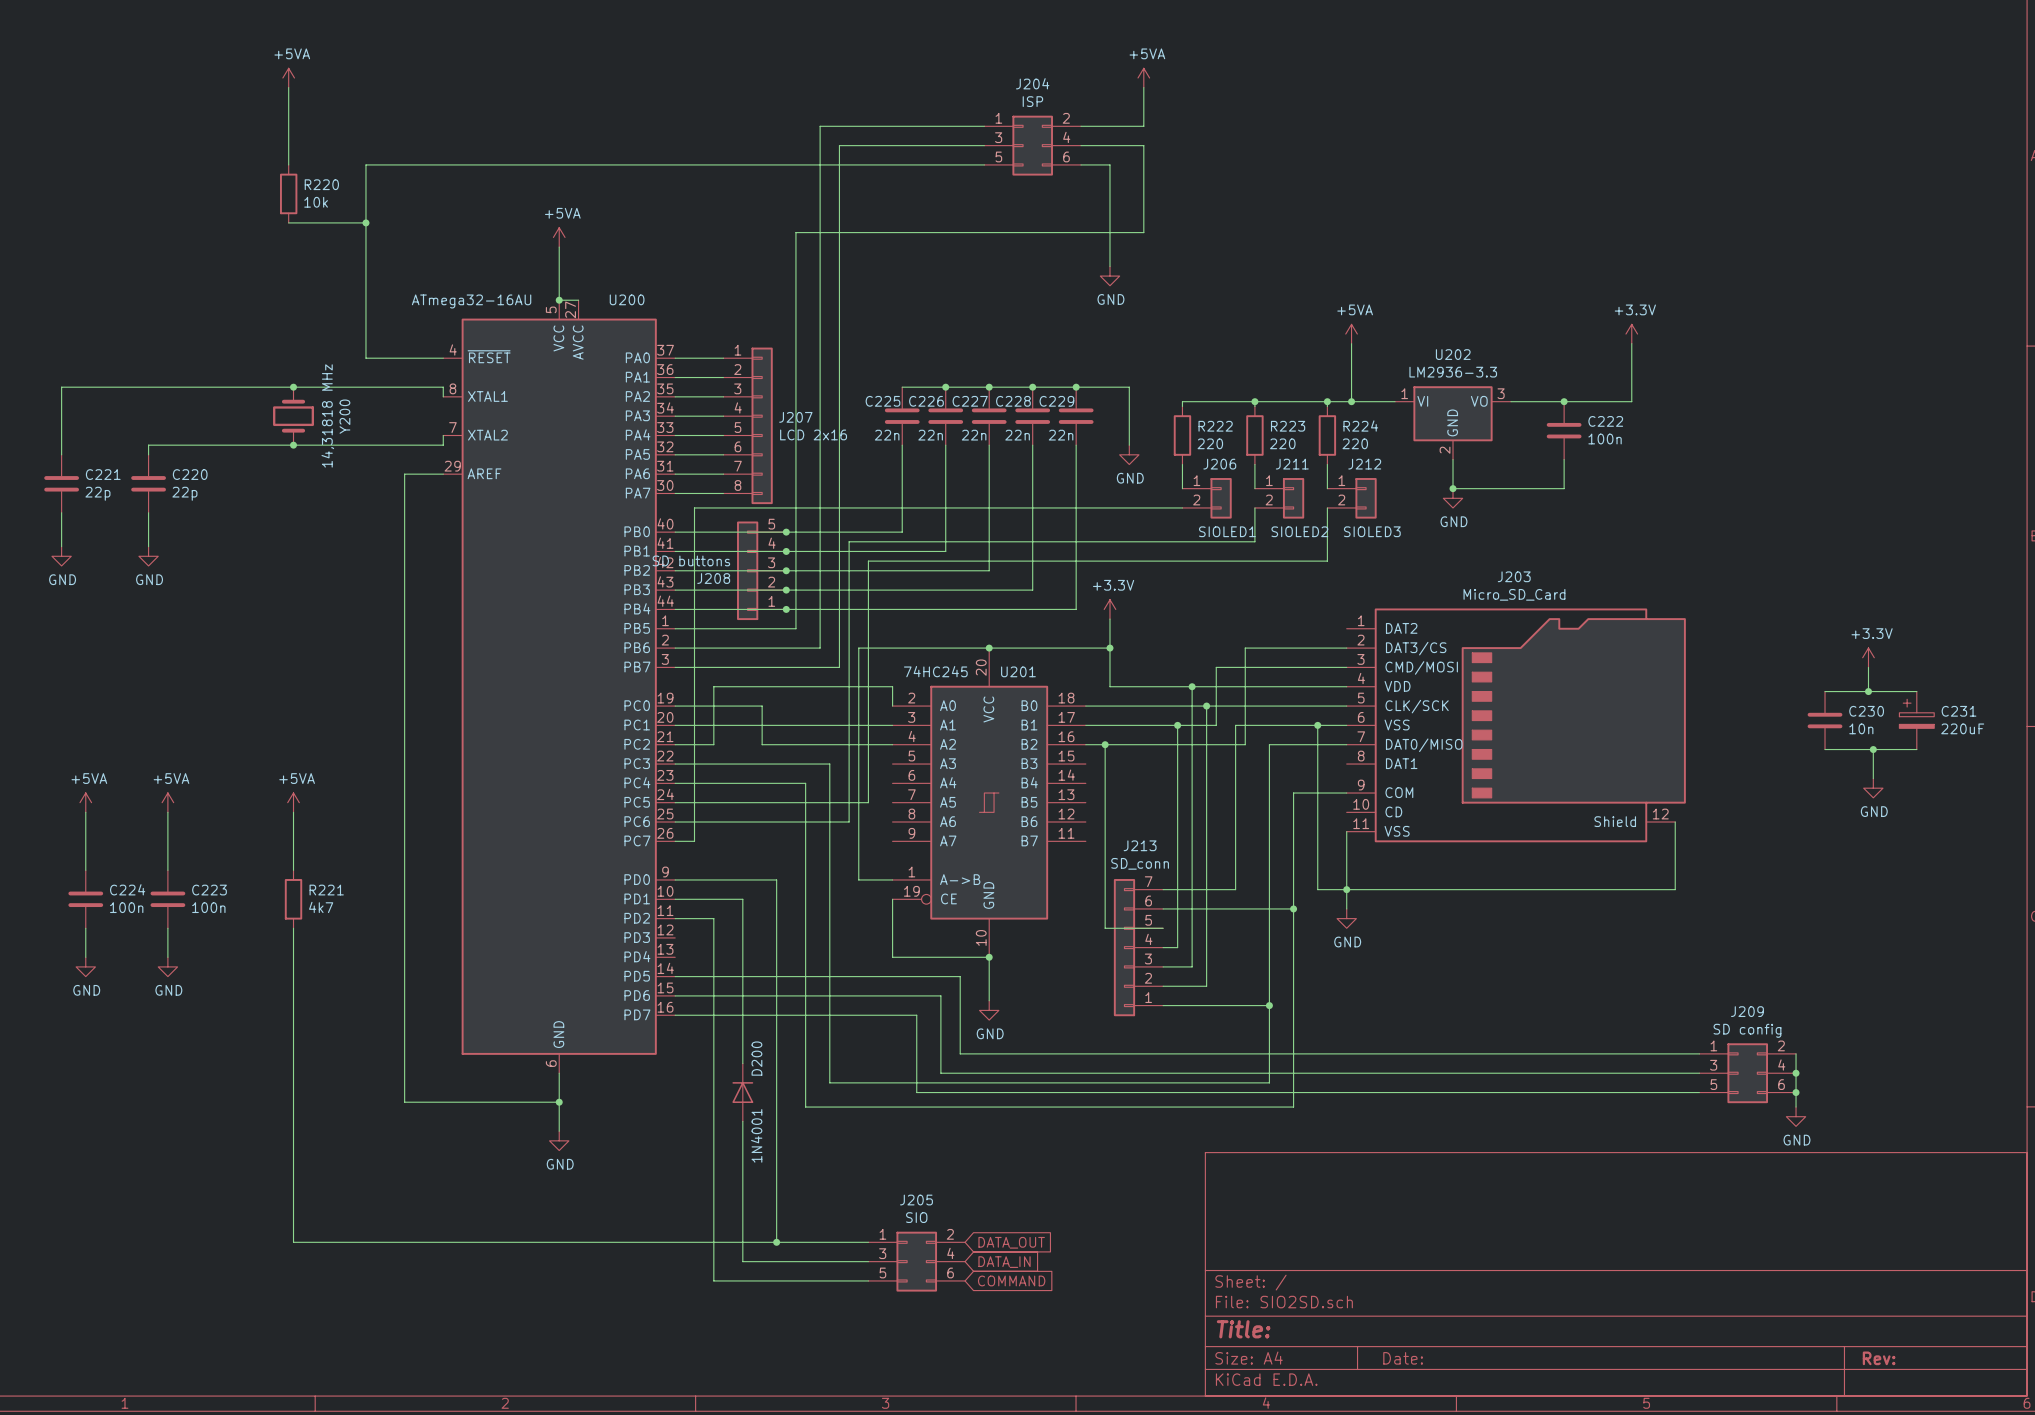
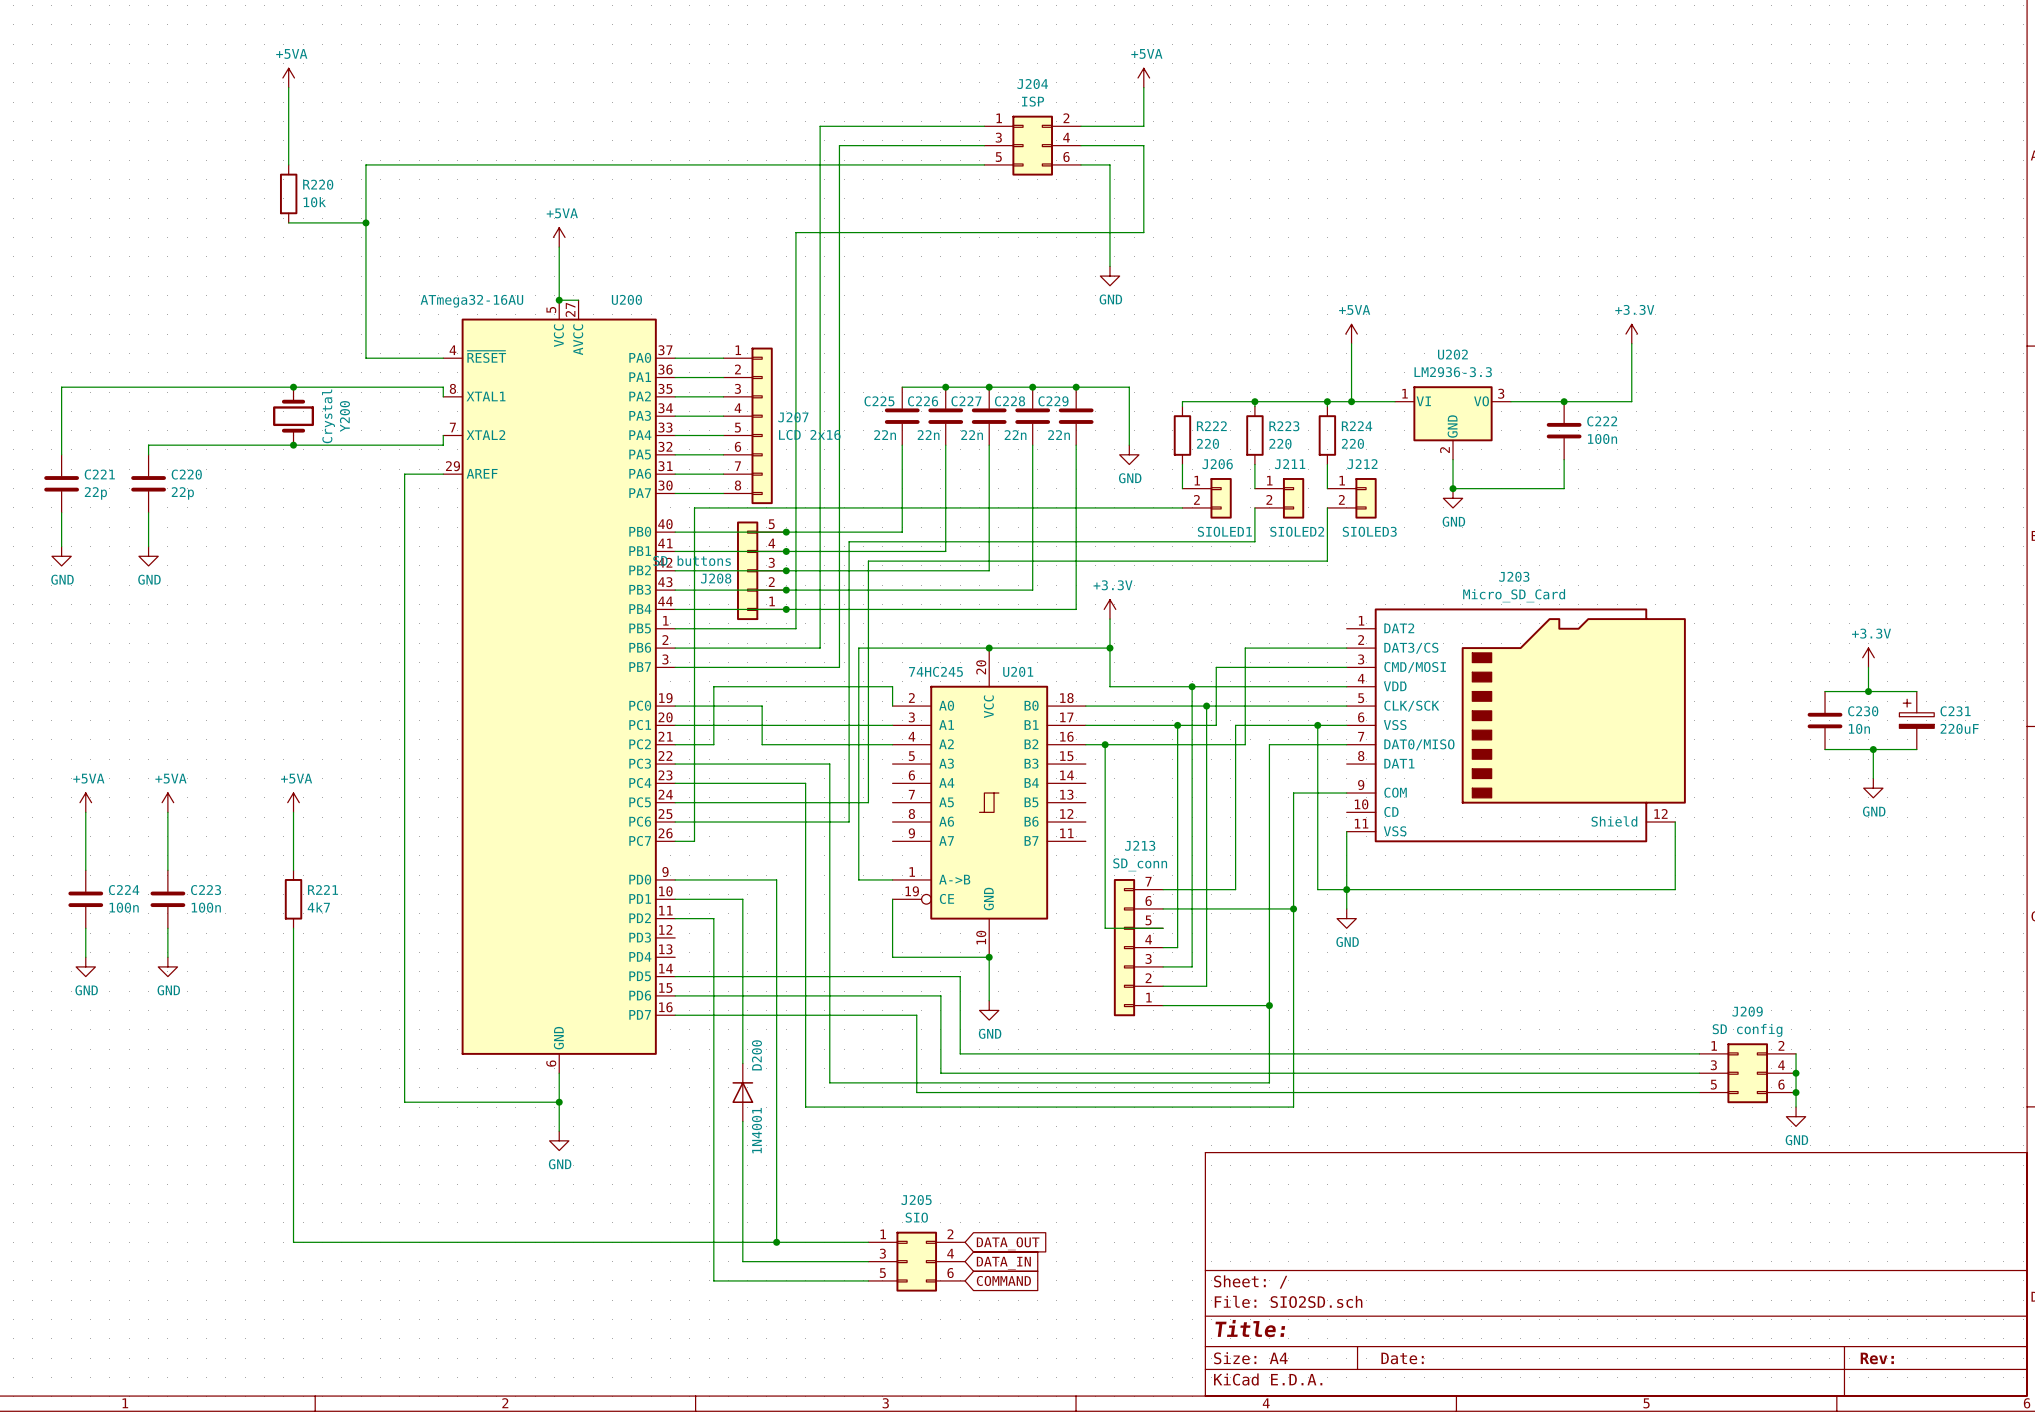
Y200 value: 14,31818 MHz (327, 415) -> Crystal (328, 416)

